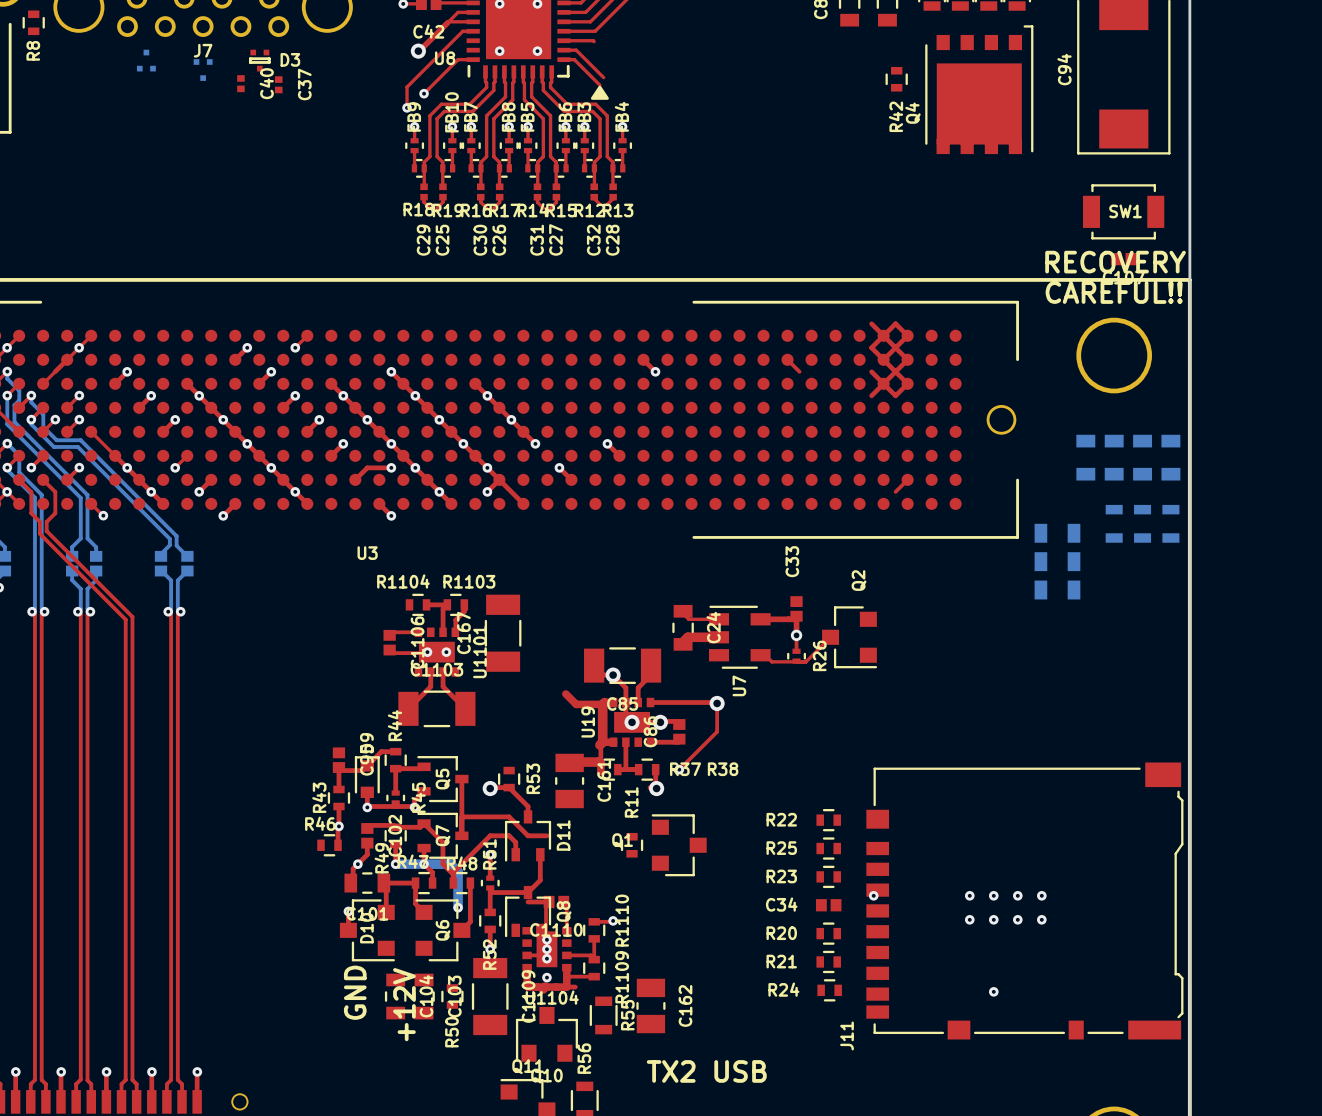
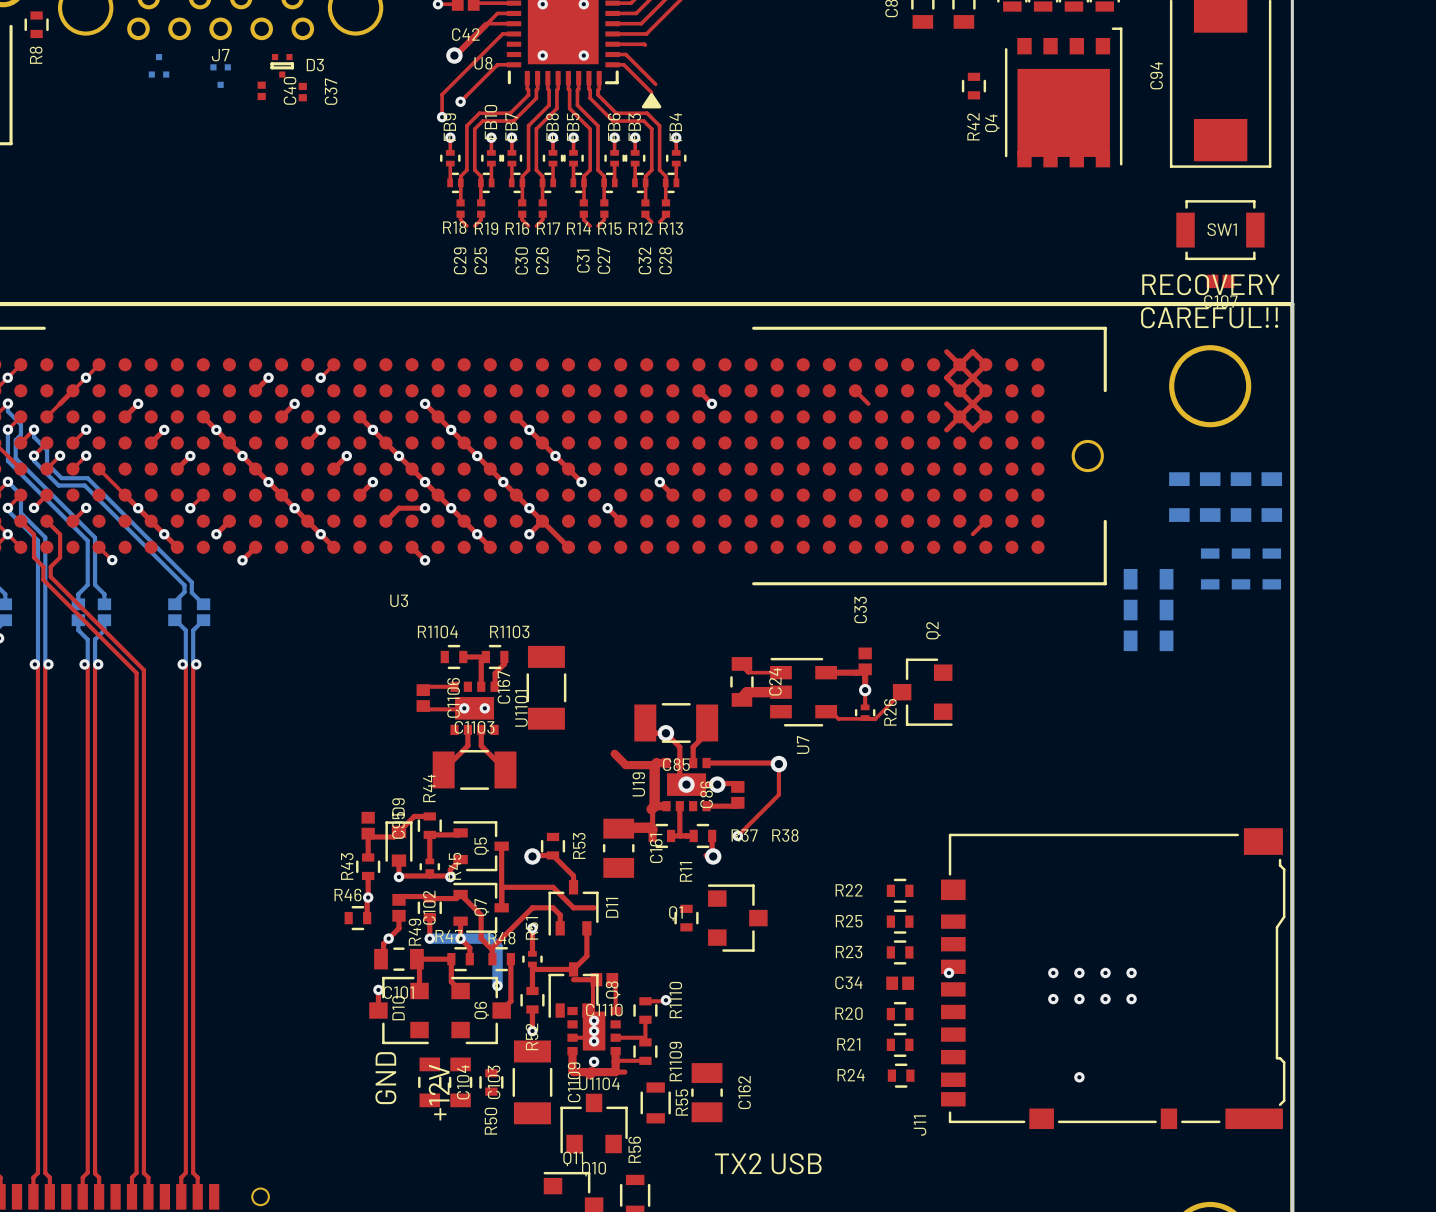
via: (15, 1071) -> none
via: (61, 1071) -> none
via: (106, 1071) -> none
via: (151, 1071) -> none
via: (197, 1071) -> none
top track: (15, 1072) (15, 1101) -> none
top track: (61, 1072) (61, 1101) -> none
top track: (106, 1072) (106, 1101) -> none
top track: (151, 1072) (151, 1101) -> none
top track: (197, 1072) (197, 1101) -> none

